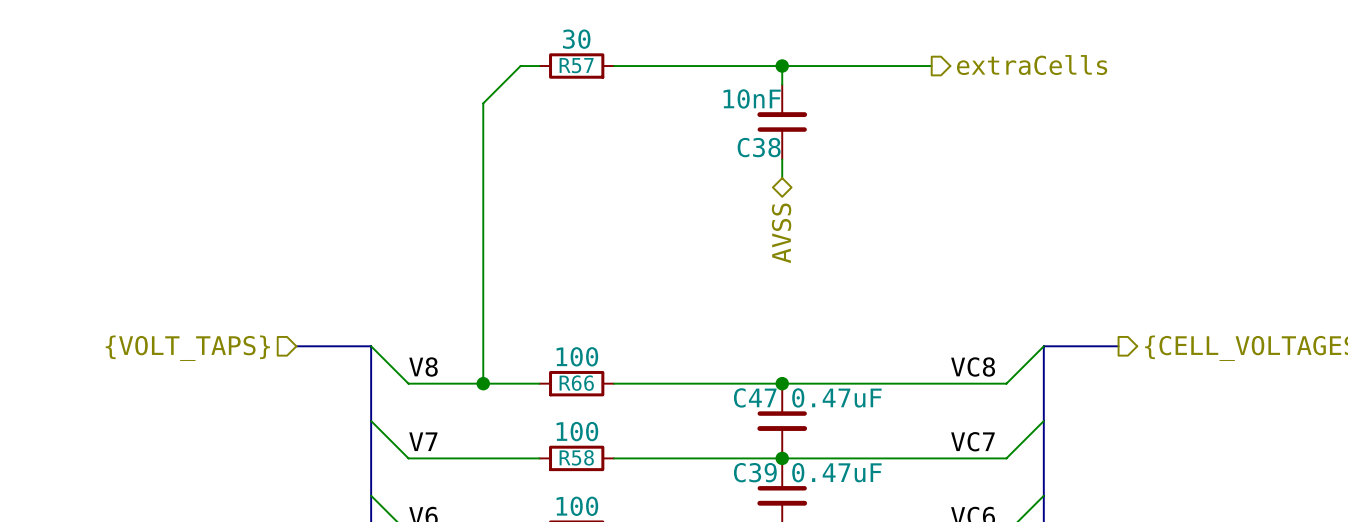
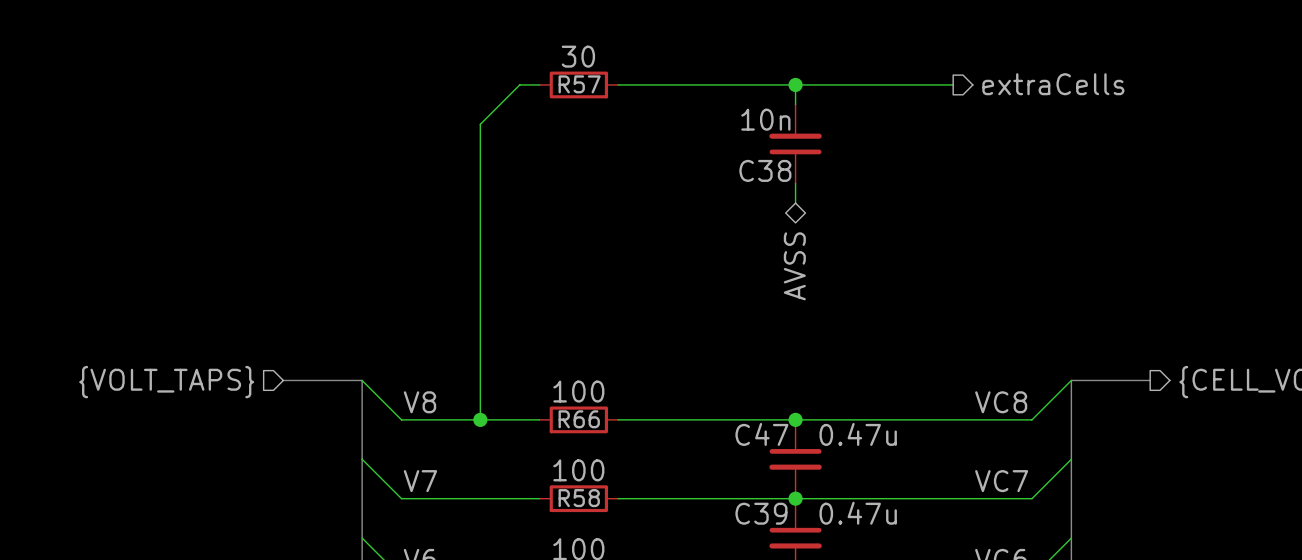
C38 value: 10nF (752, 98) -> 10n (765, 119)
C47 value: 0.47uF (836, 397) -> 0.47u (858, 434)
C39 value: 0.47uF (836, 472) -> 0.47u (858, 513)

